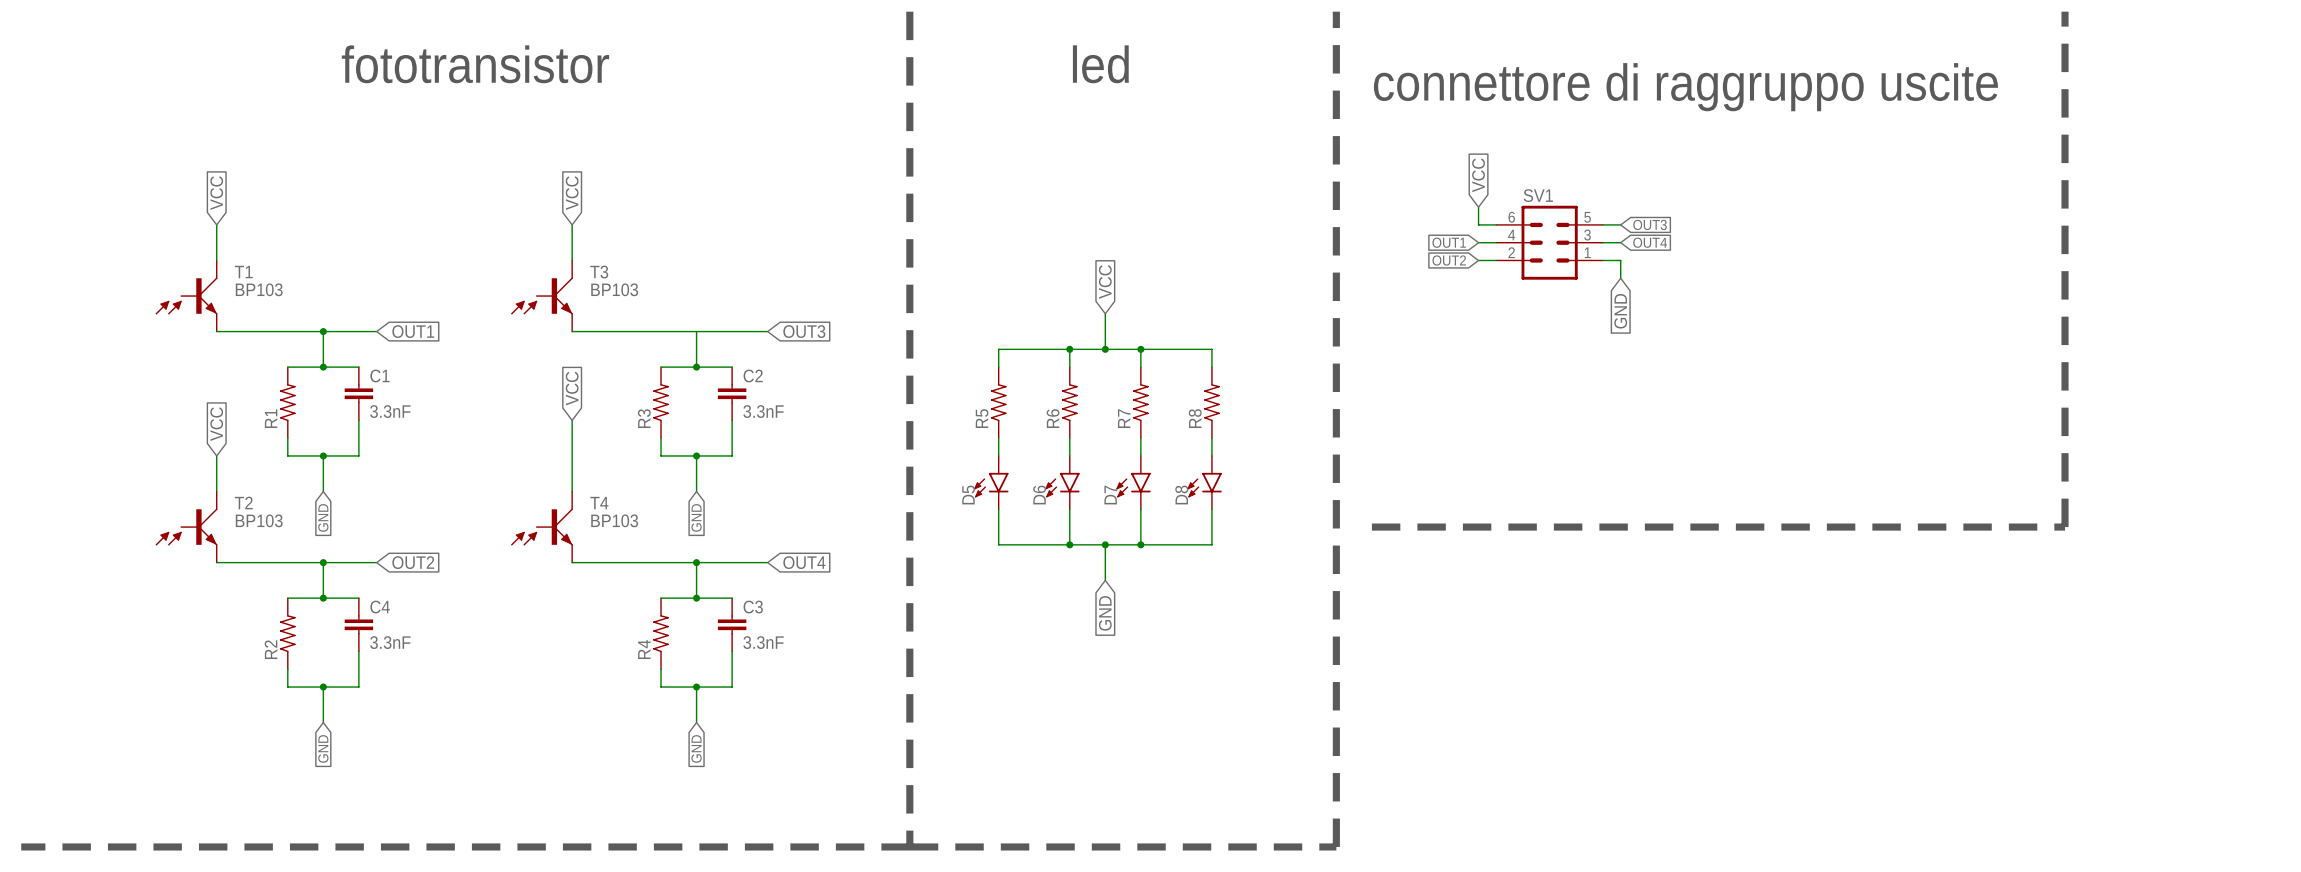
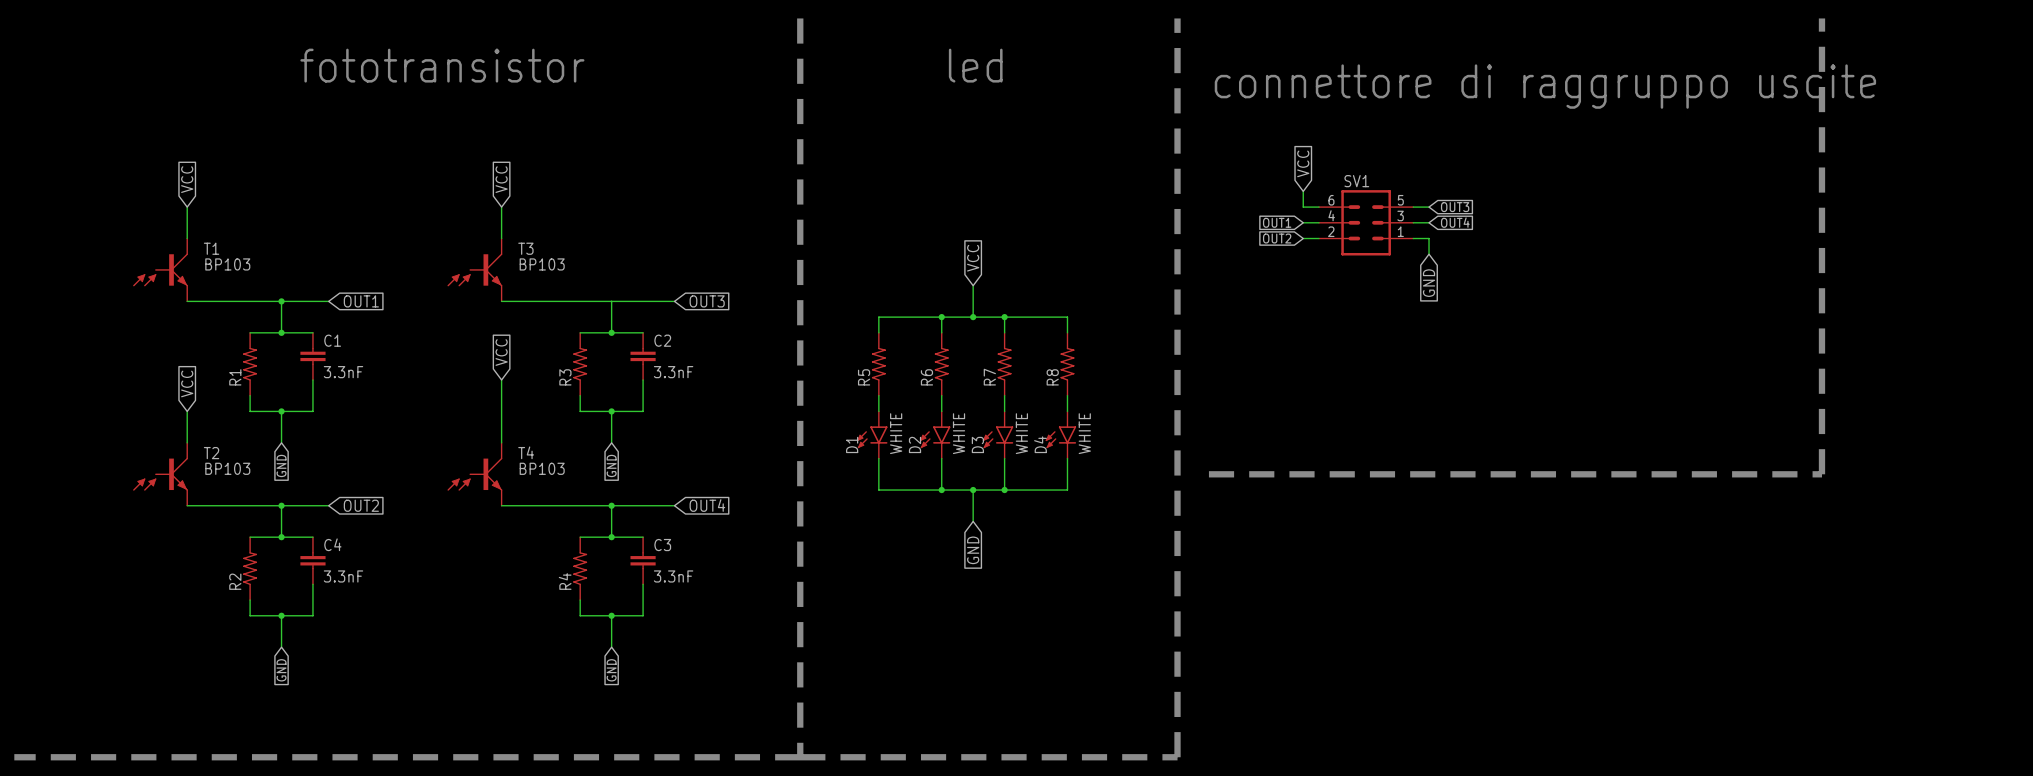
D5 value: none -> WHITE (896, 433)
D6 value: none -> WHITE (959, 433)
D7 value: none -> WHITE (1021, 433)
D8 value: none -> WHITE (1084, 433)
D5 name: D5 (968, 495) -> D1 (852, 444)
D6 name: D6 (1039, 495) -> D2 (915, 444)
D7 name: D7 (1110, 495) -> D3 (977, 444)
D8 name: D8 (1181, 495) -> D4 (1040, 444)

